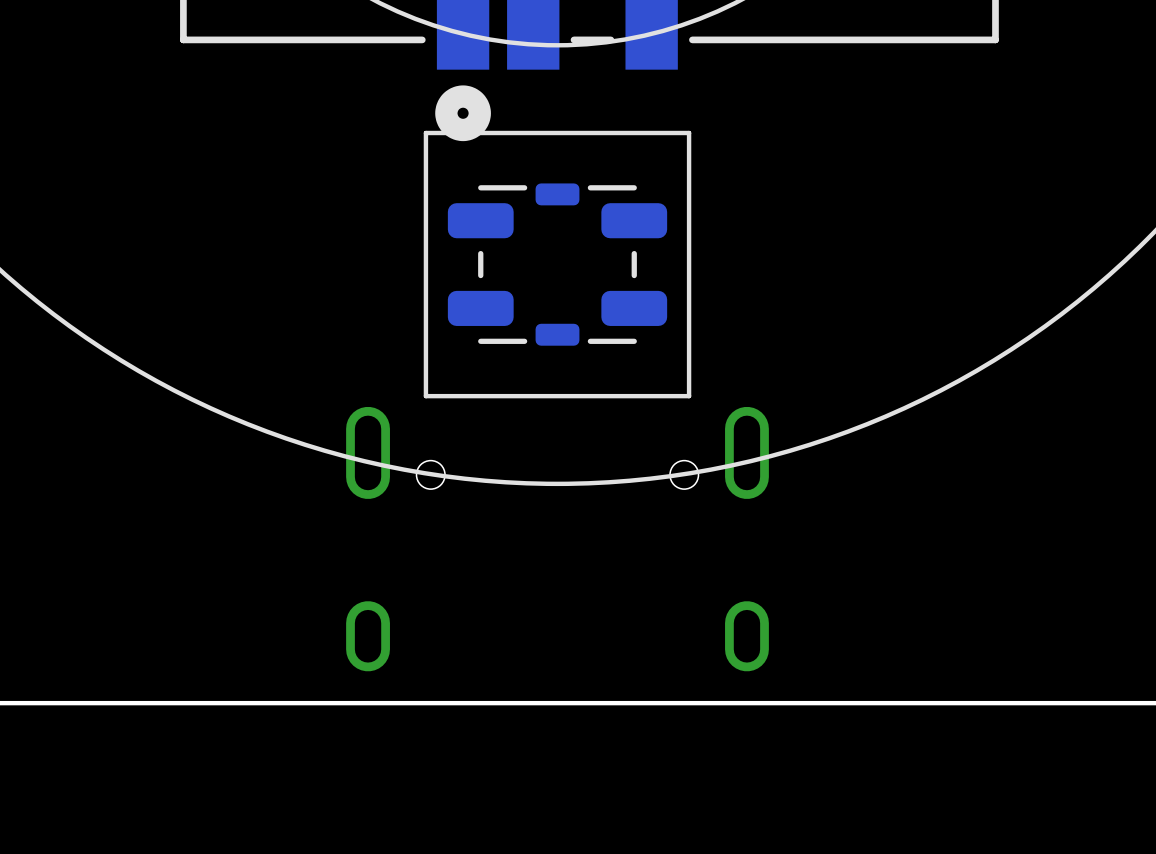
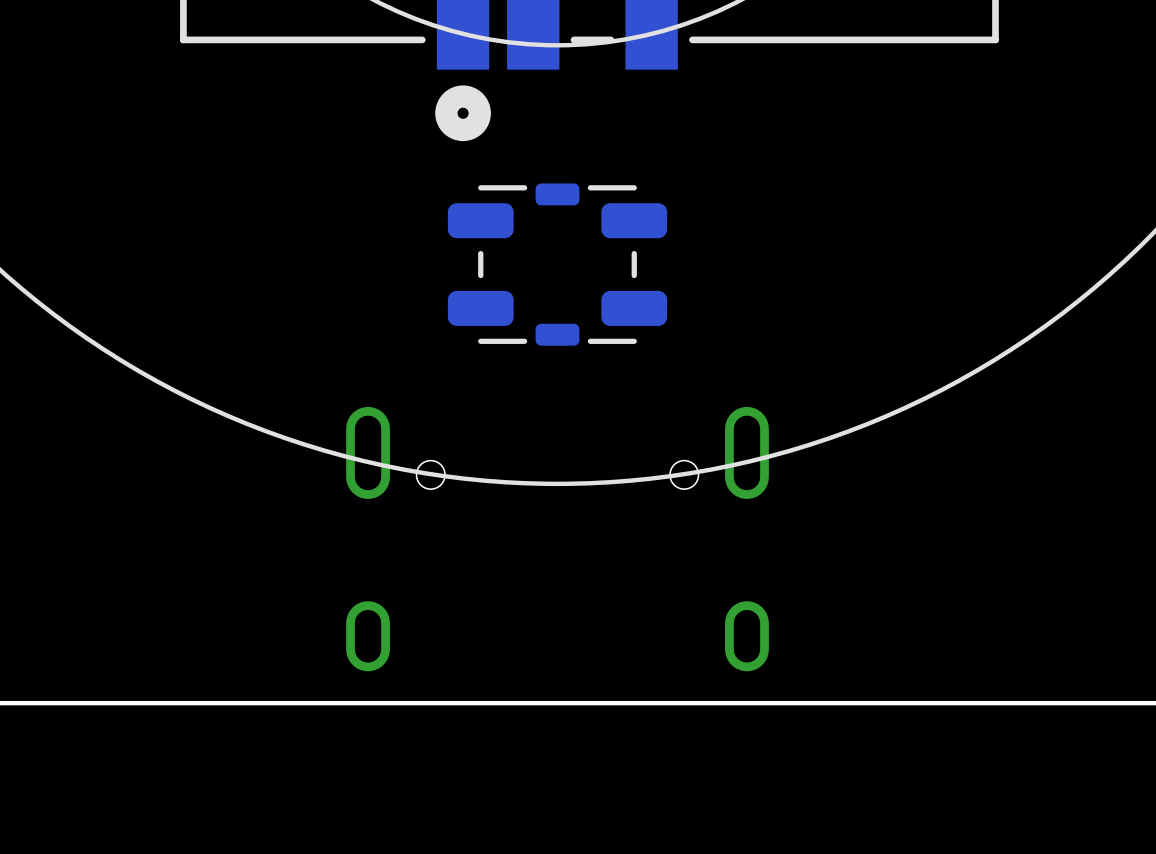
line: (689, 133) (689, 396) (425, 396) (425, 133) (689, 133) -> none

